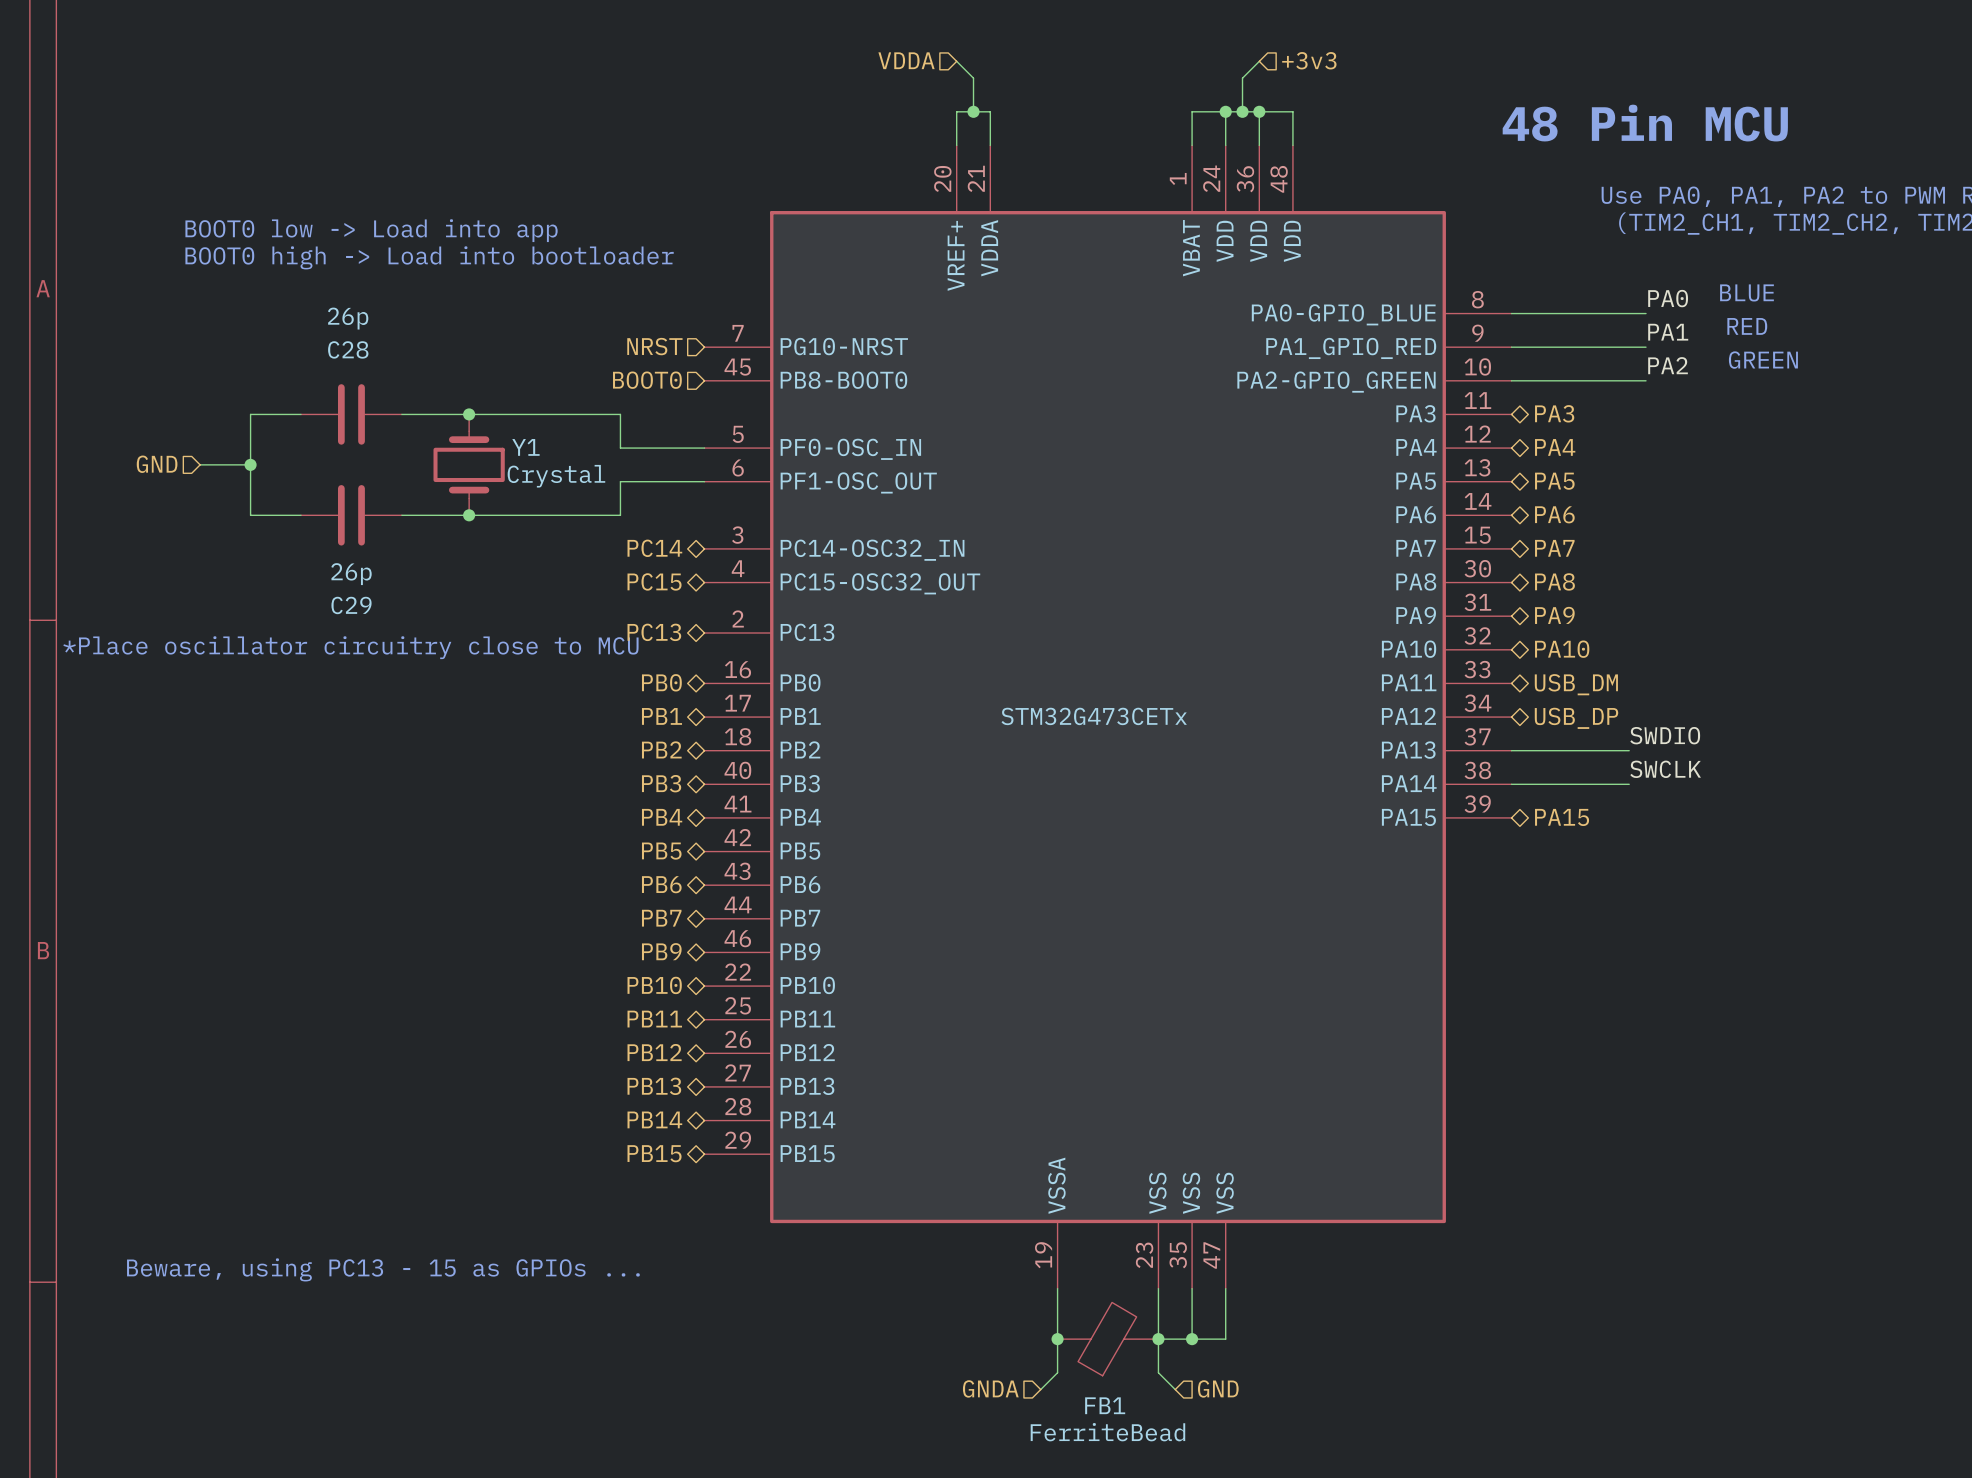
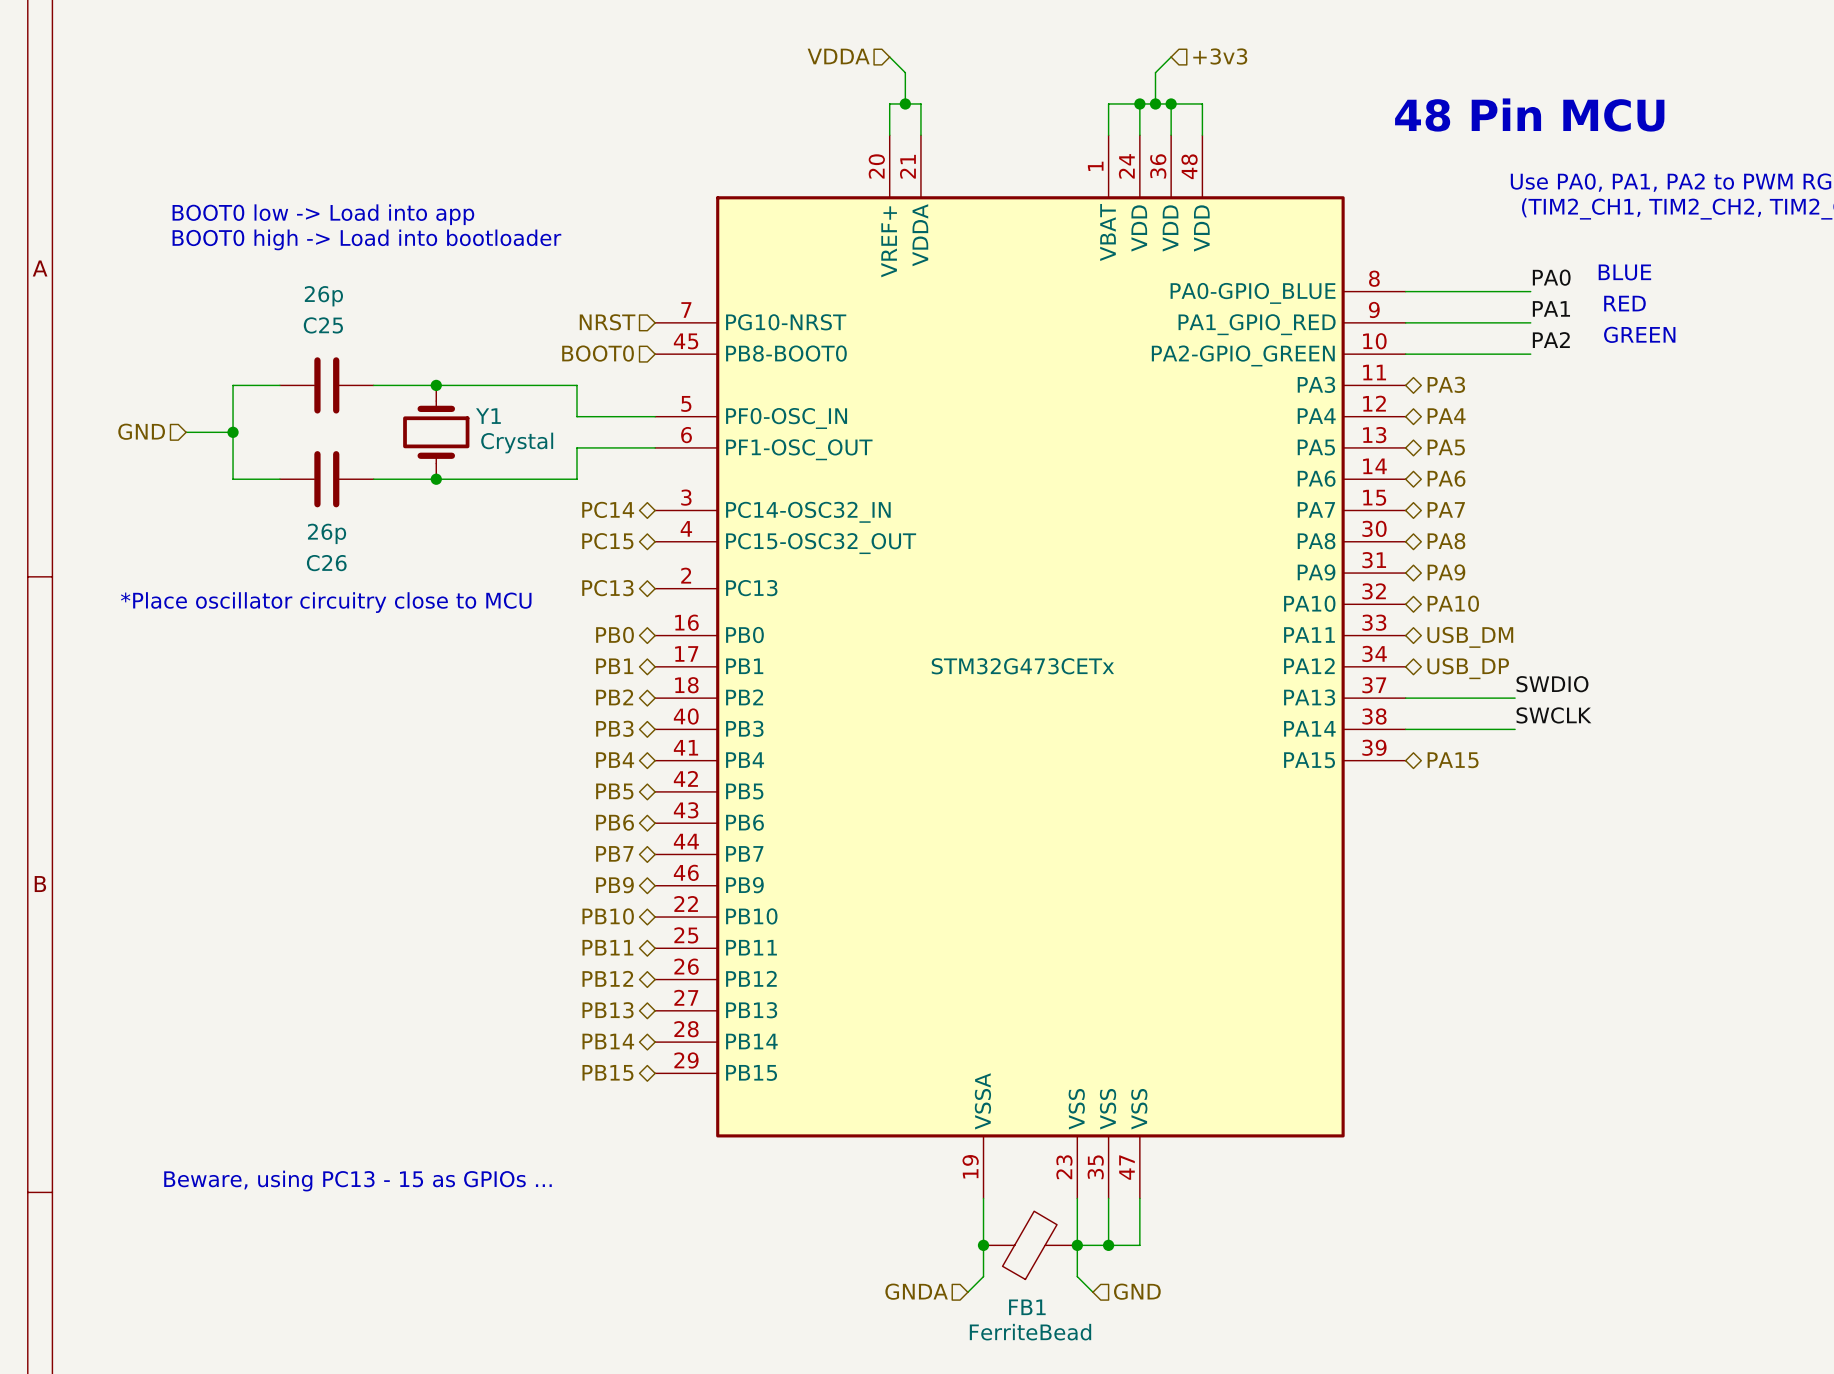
C28 name: C28 (348, 349) -> C25 (323, 325)
C29 name: C29 (351, 605) -> C26 (326, 563)

